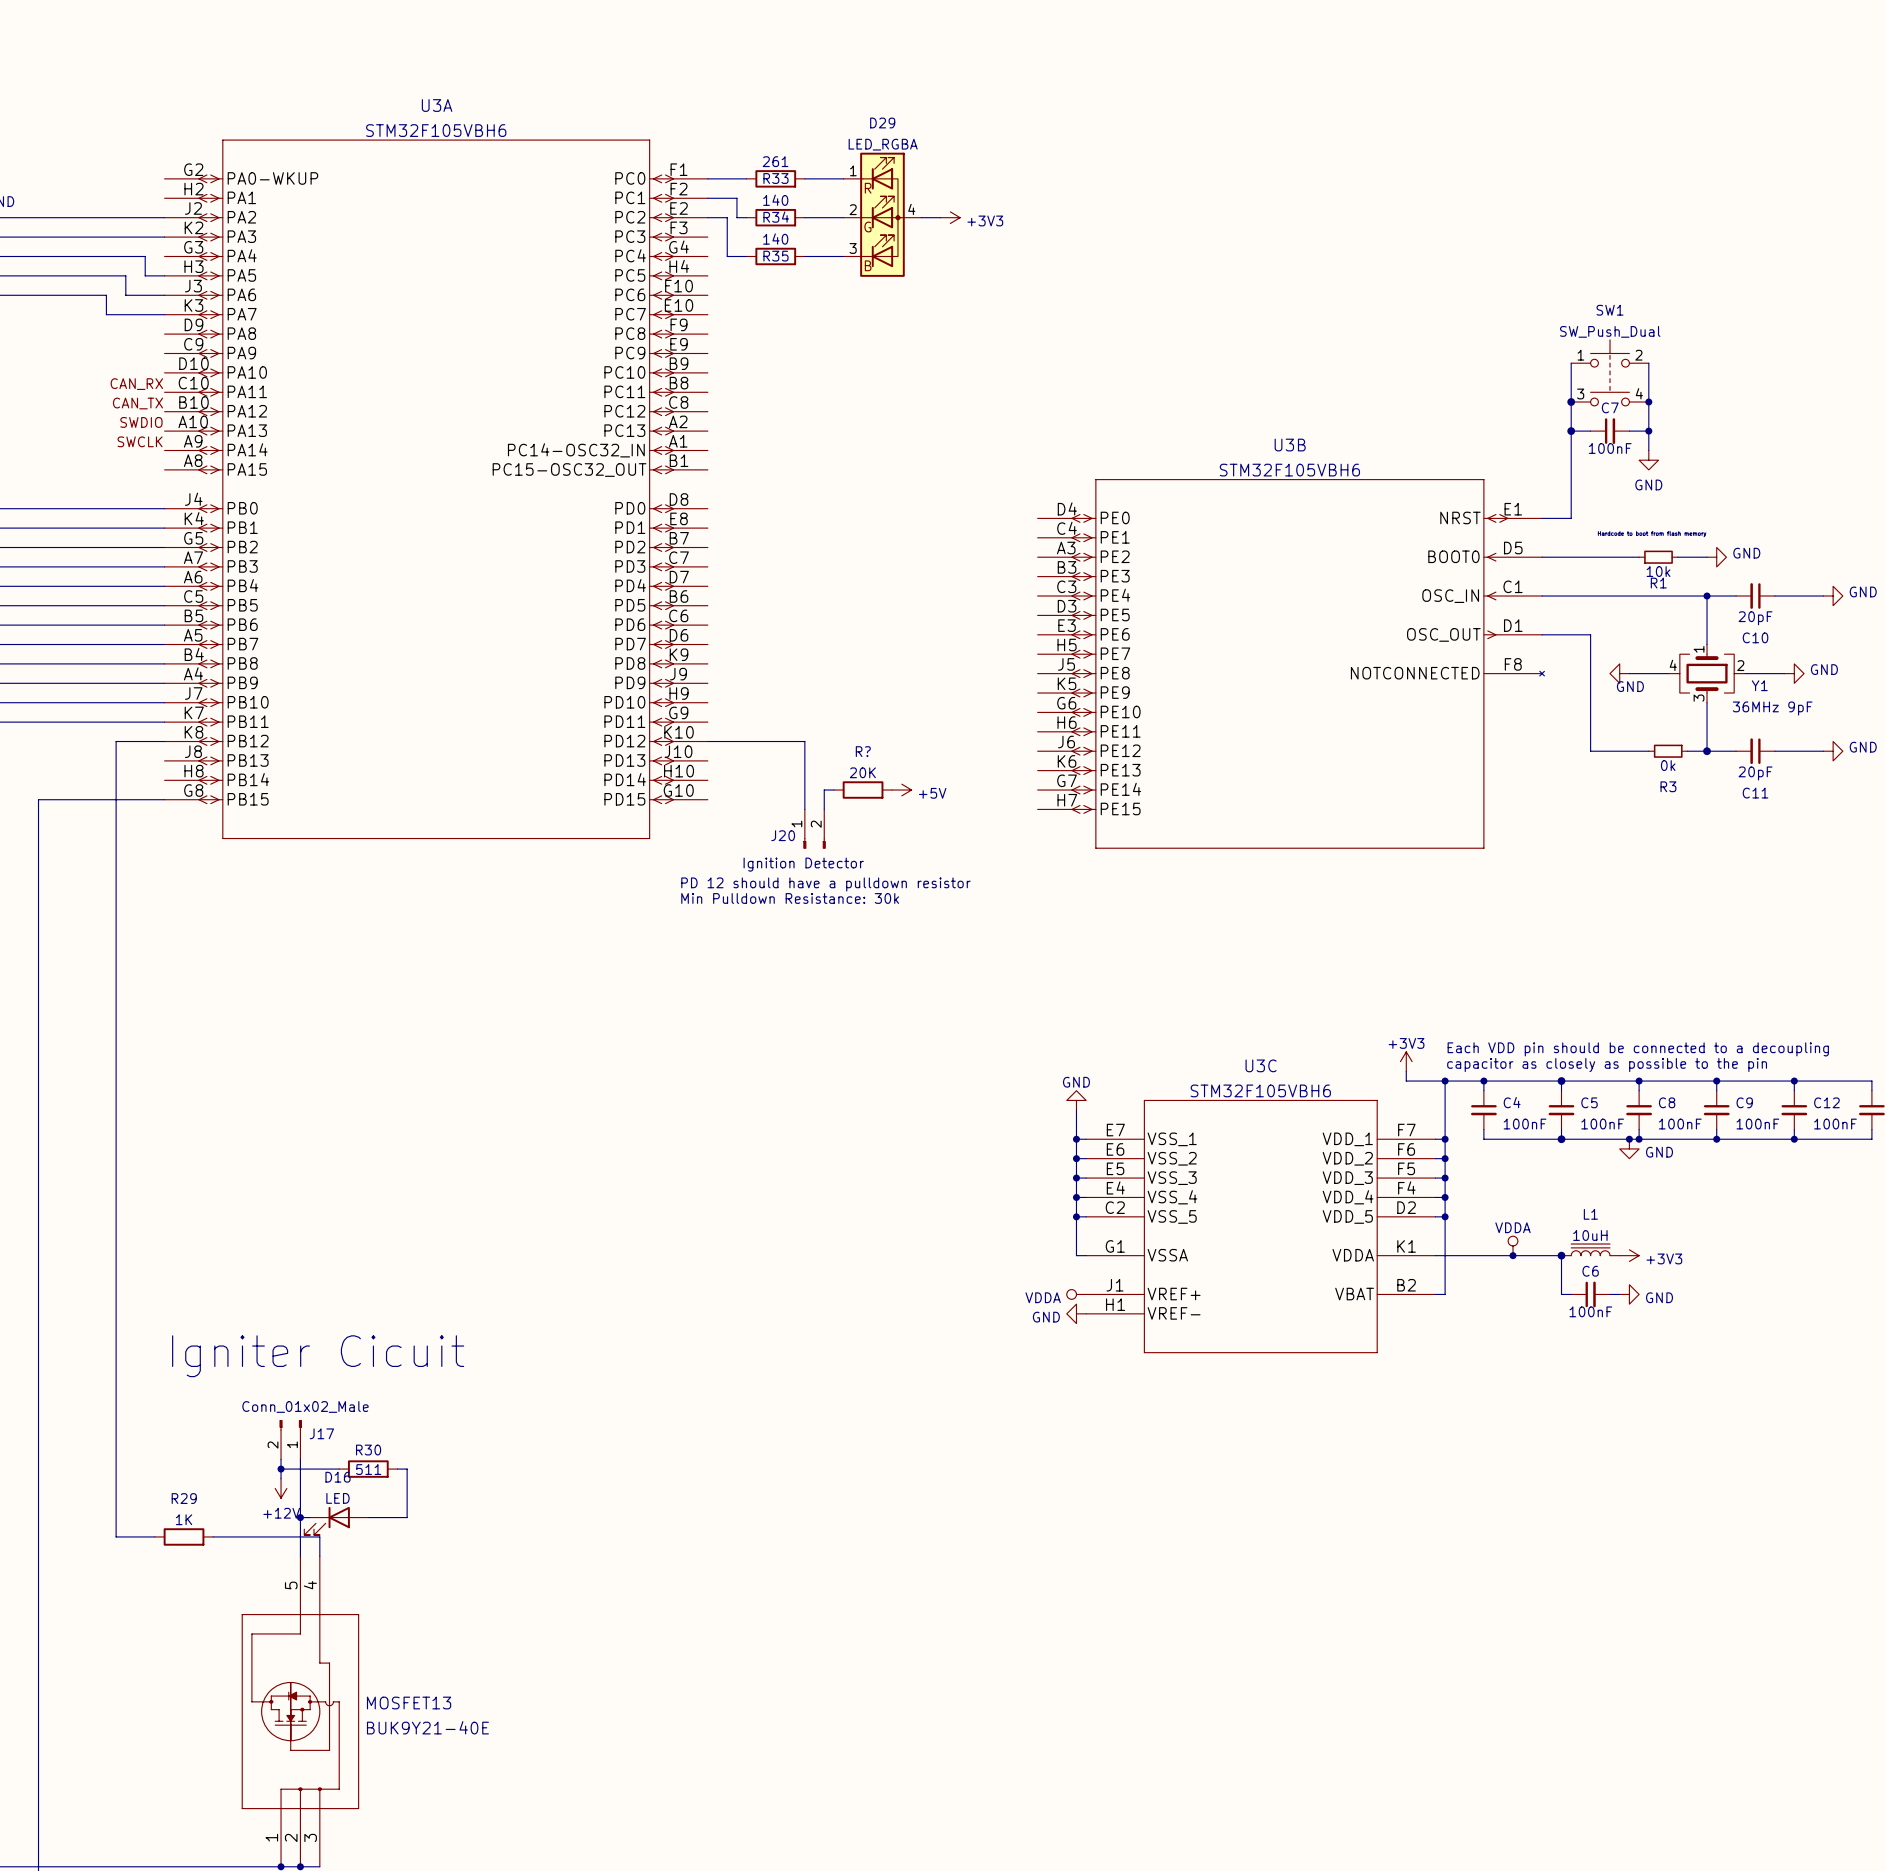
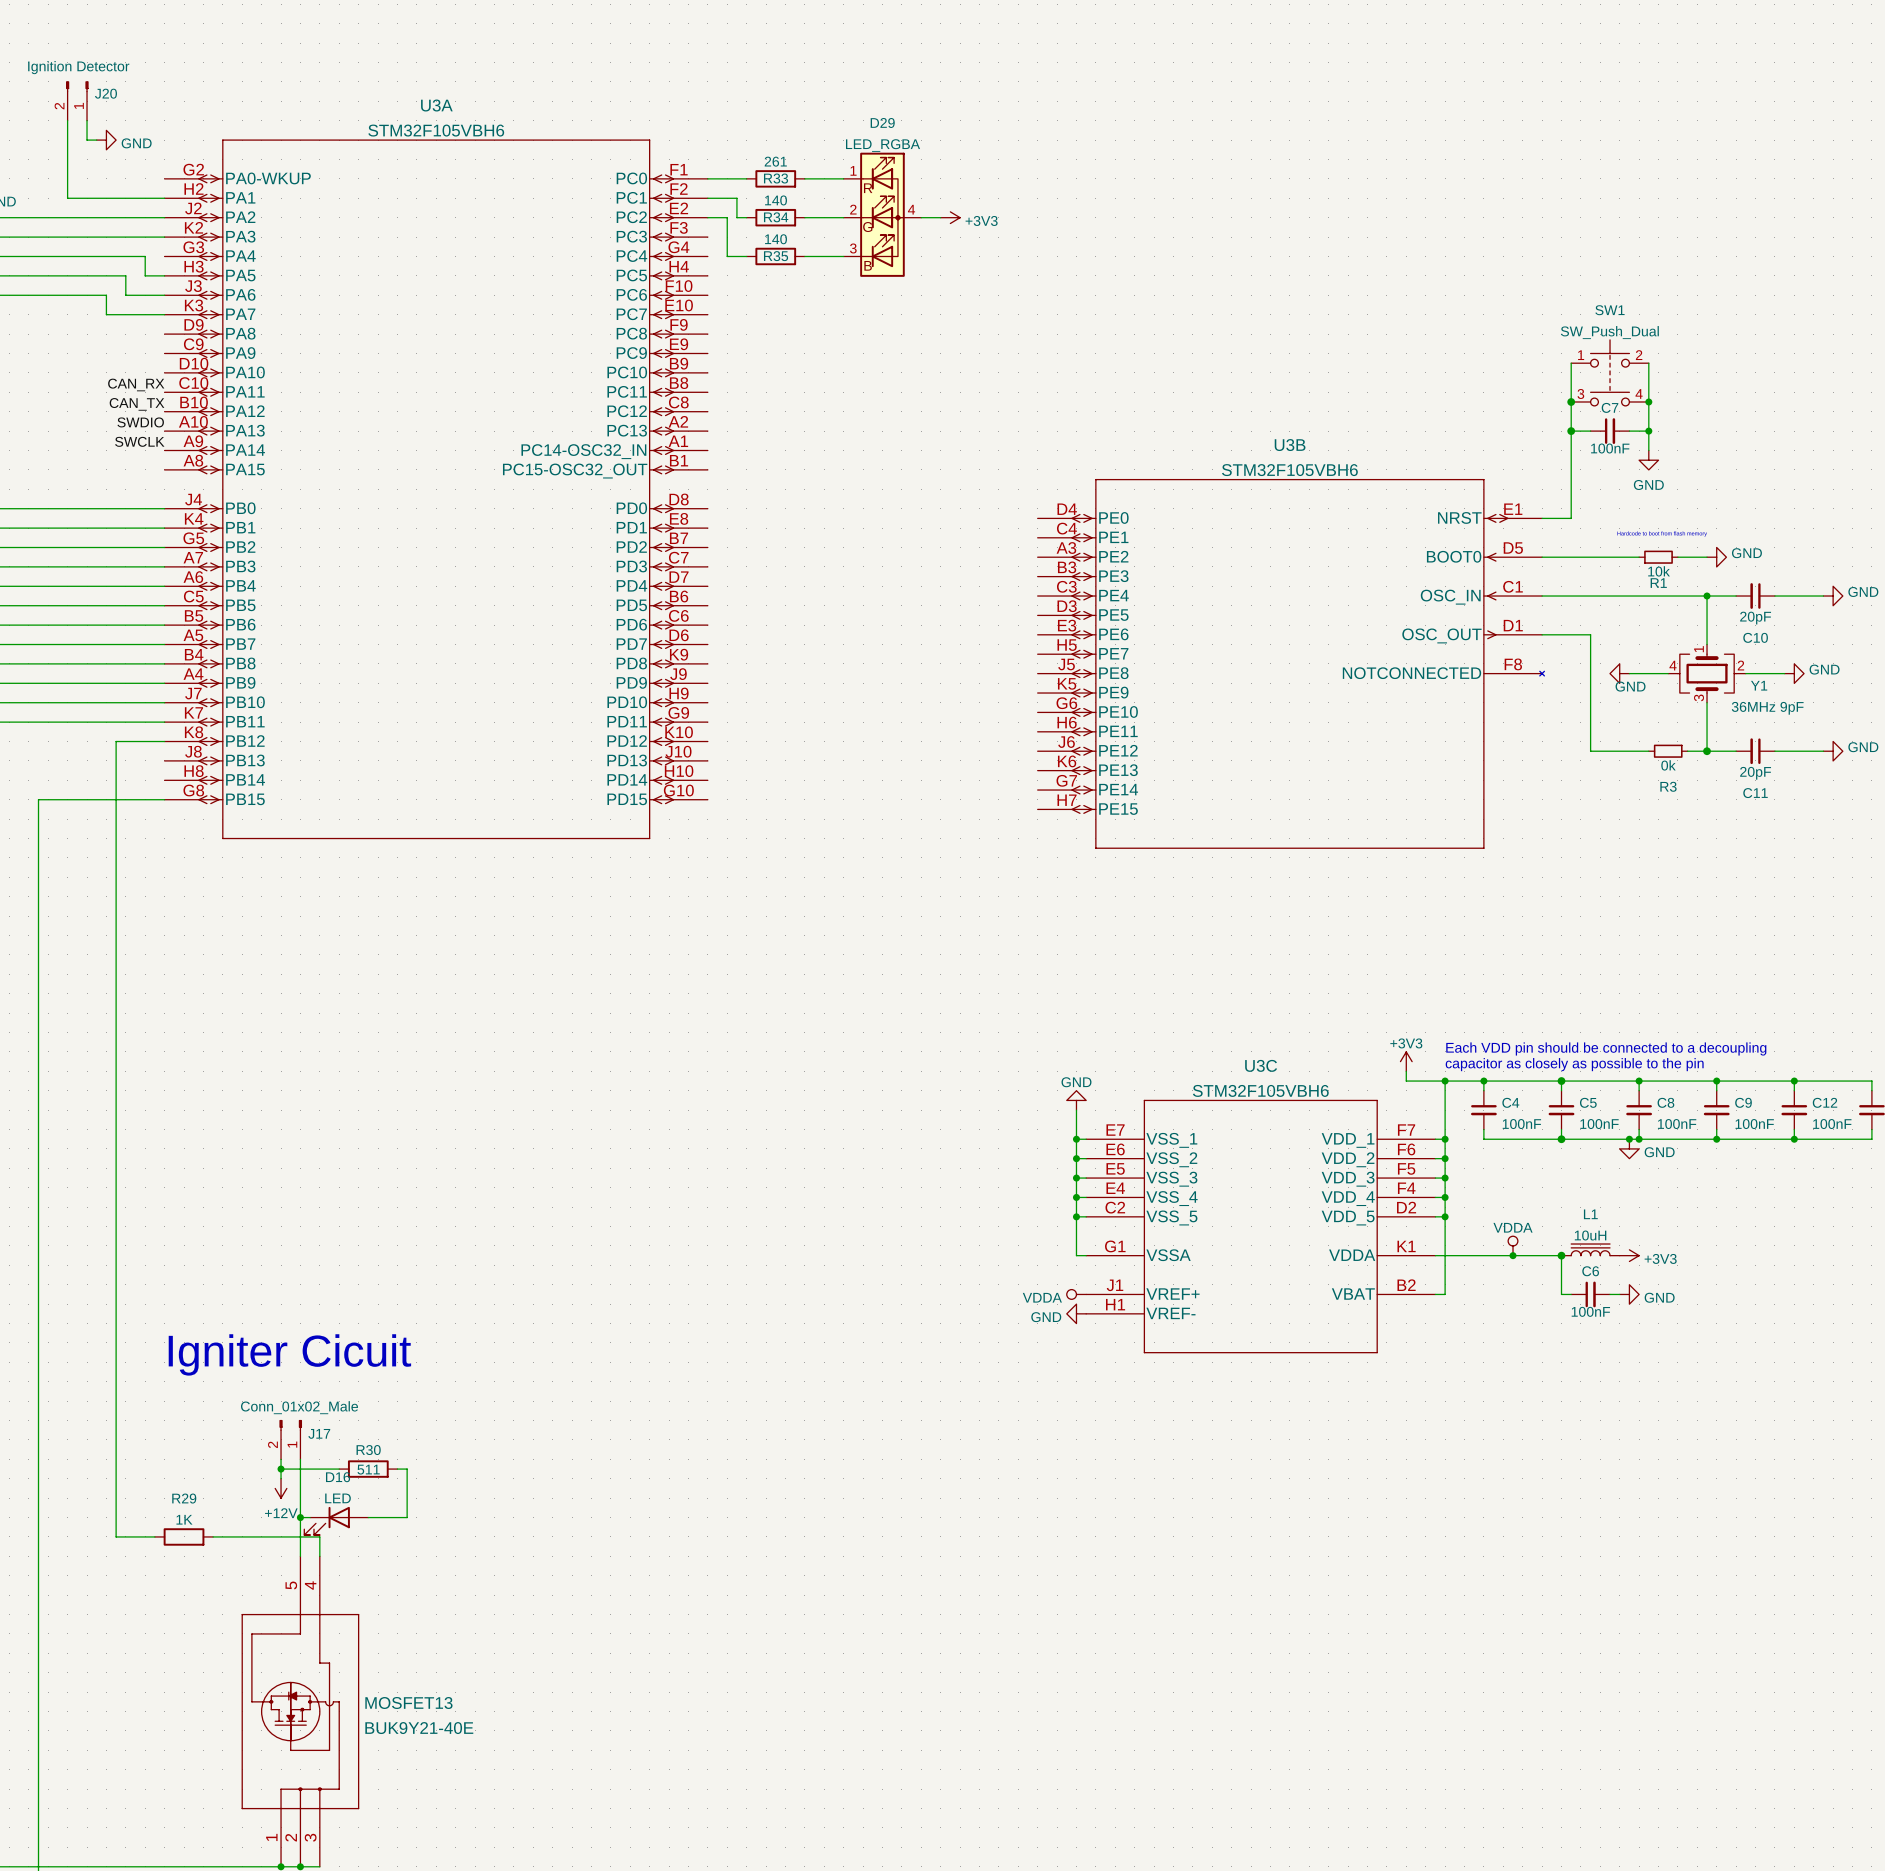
wire: none -> (67, 120) (67, 198) (164, 198)
wire: none -> (87, 120) (87, 140) (96, 140)
power symbol: none -> GND (106, 140)
wire: (707, 741) (804, 741) (804, 809) -> none
wire: (833, 790) (824, 790) (824, 809) -> none
R?: 20K (863, 790) -> none
power symbol: +5V (901, 790) -> none
J20 position: (814, 829) -> (77, 100)
J20 rotation: 0° (814, 843) -> 180° (77, 86)
text: PD 12 should have a pulldown resistor (825, 884) -> none
text: Min Pulldown Resistance: 30k (790, 898) -> none

